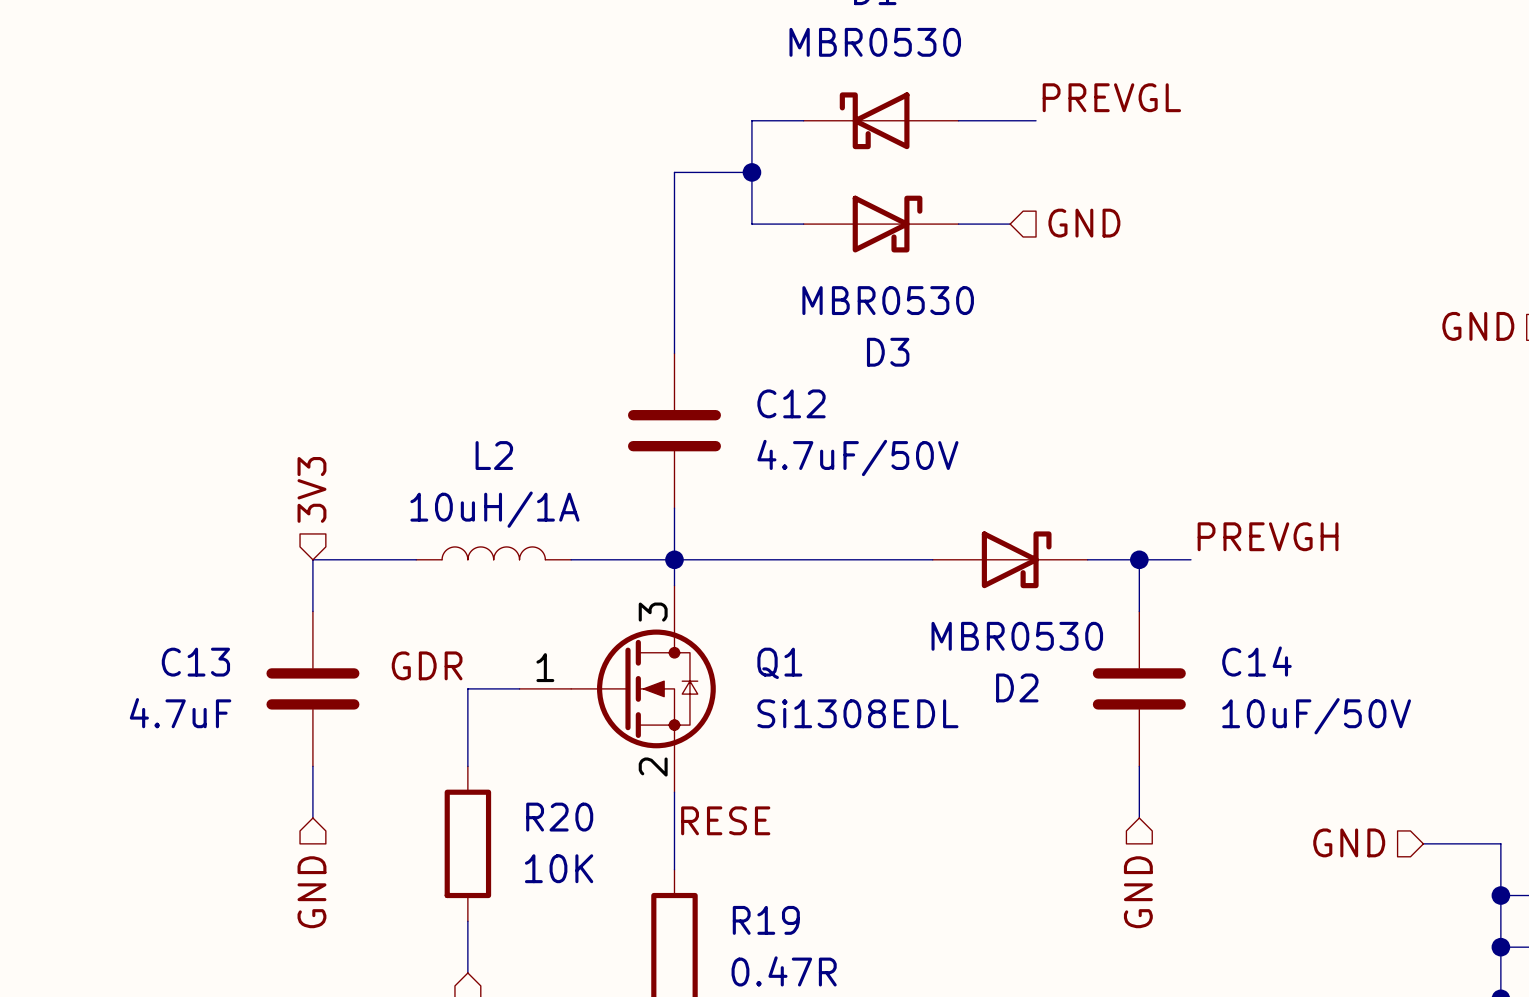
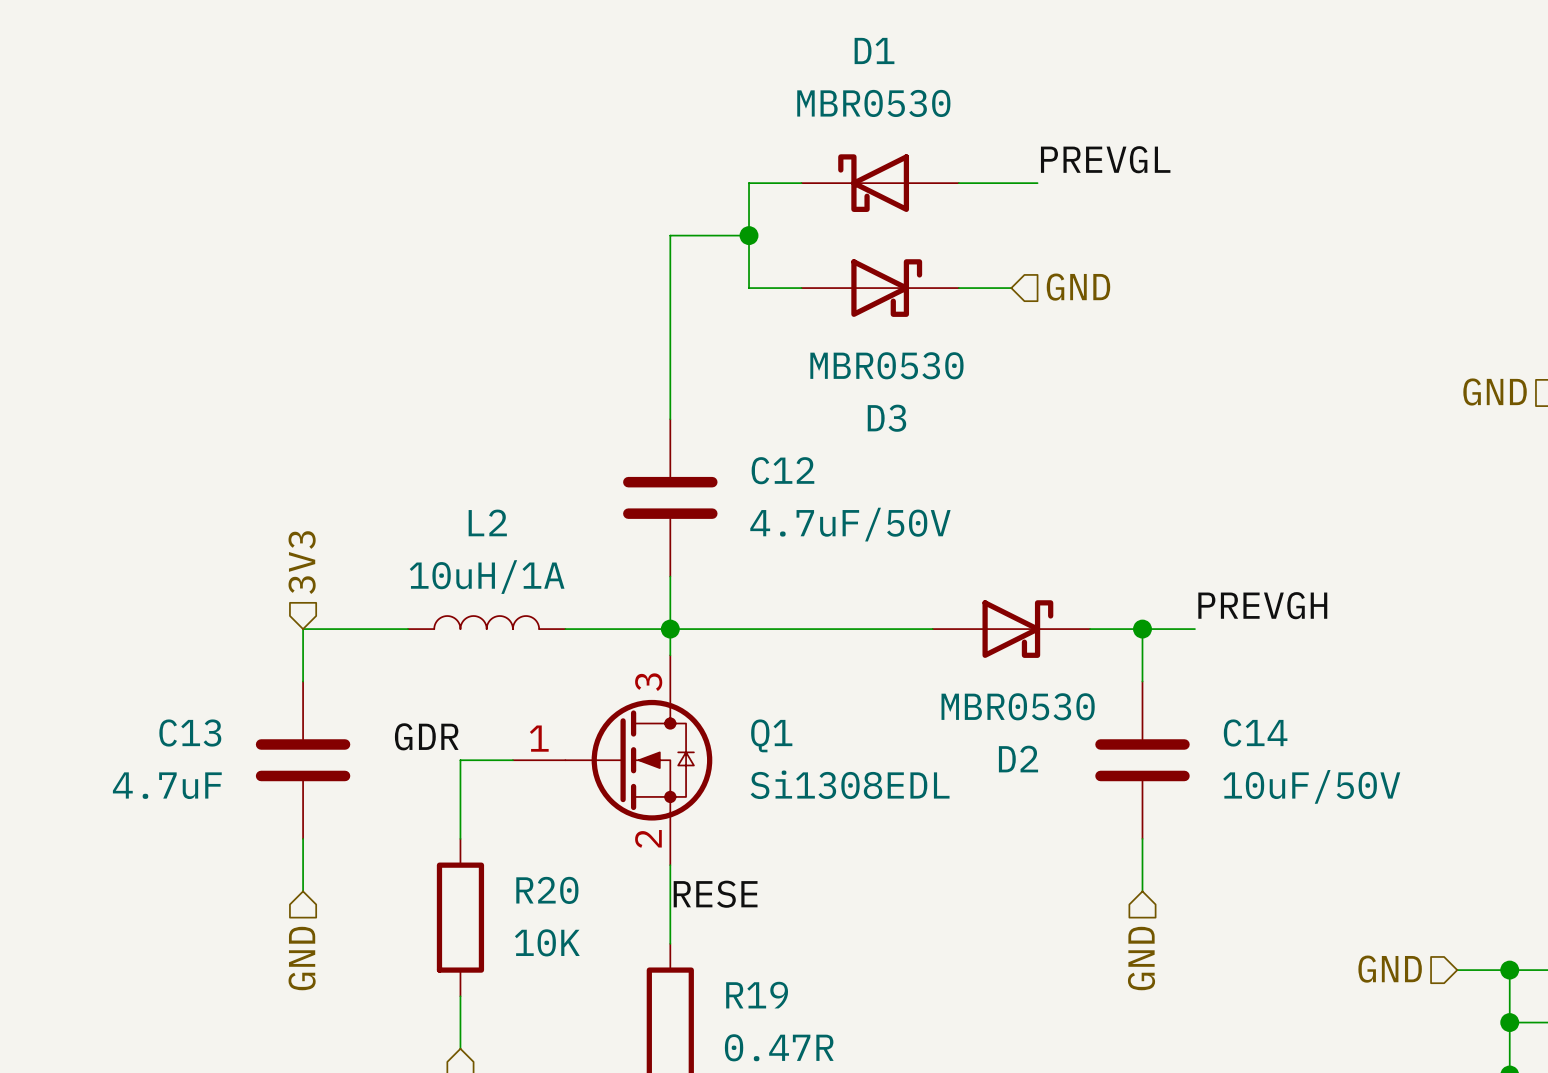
hierarchical label position: GND (1349, 842) -> GND (1390, 969)
wire: (1423, 843) (1500, 843) (1500, 895) -> (1457, 970) (1509, 970)

